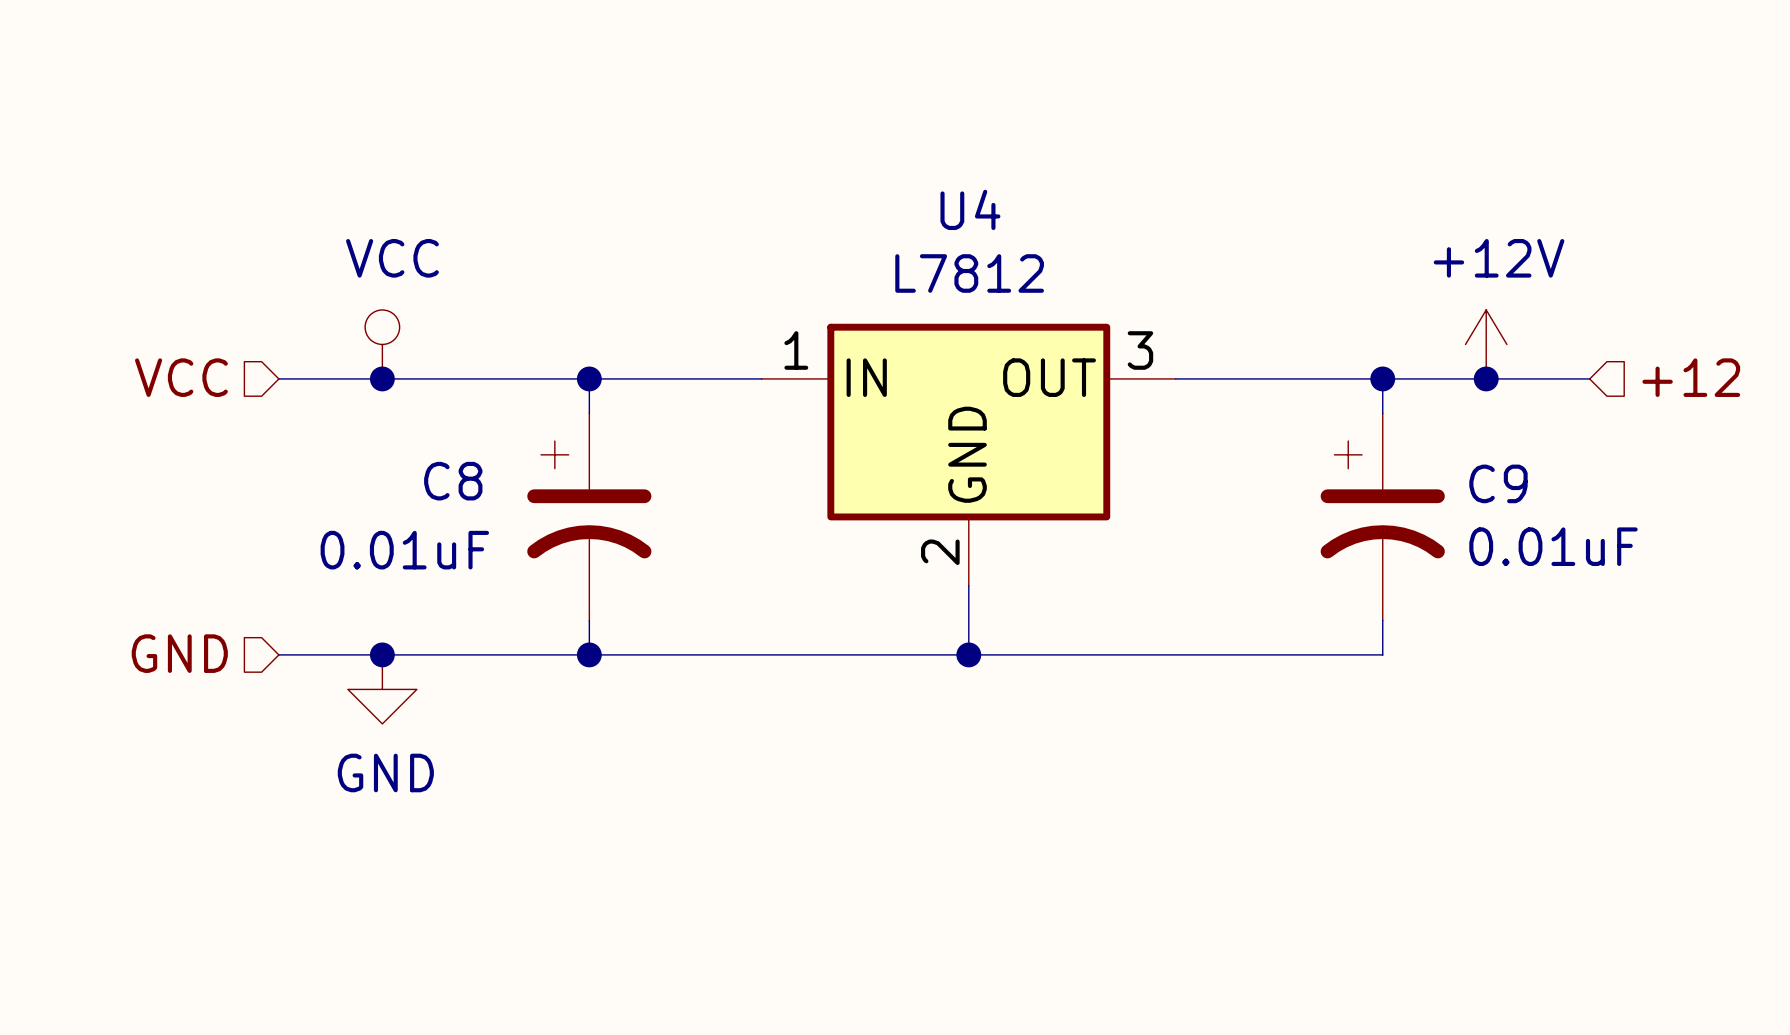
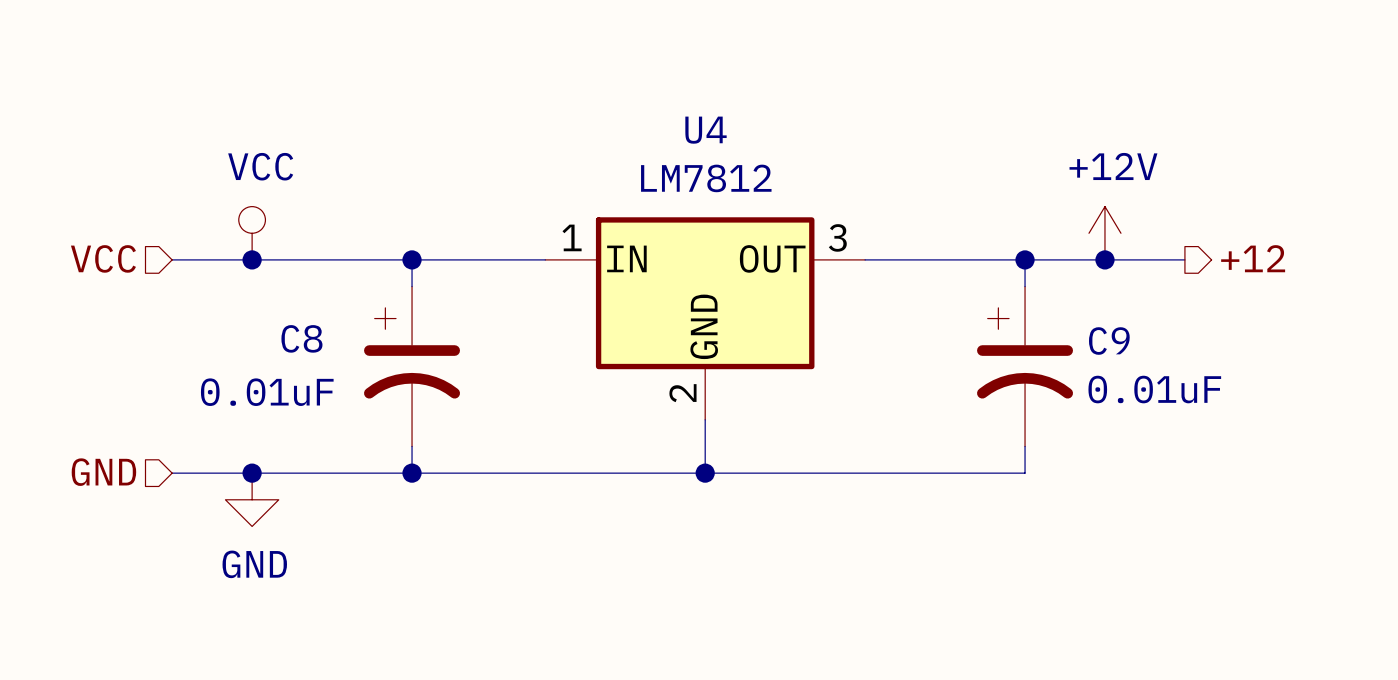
U4 value: L7812 (969, 273) -> LM7812 (706, 178)
hierarchical label shape: input (1691, 377) -> output (1253, 258)

